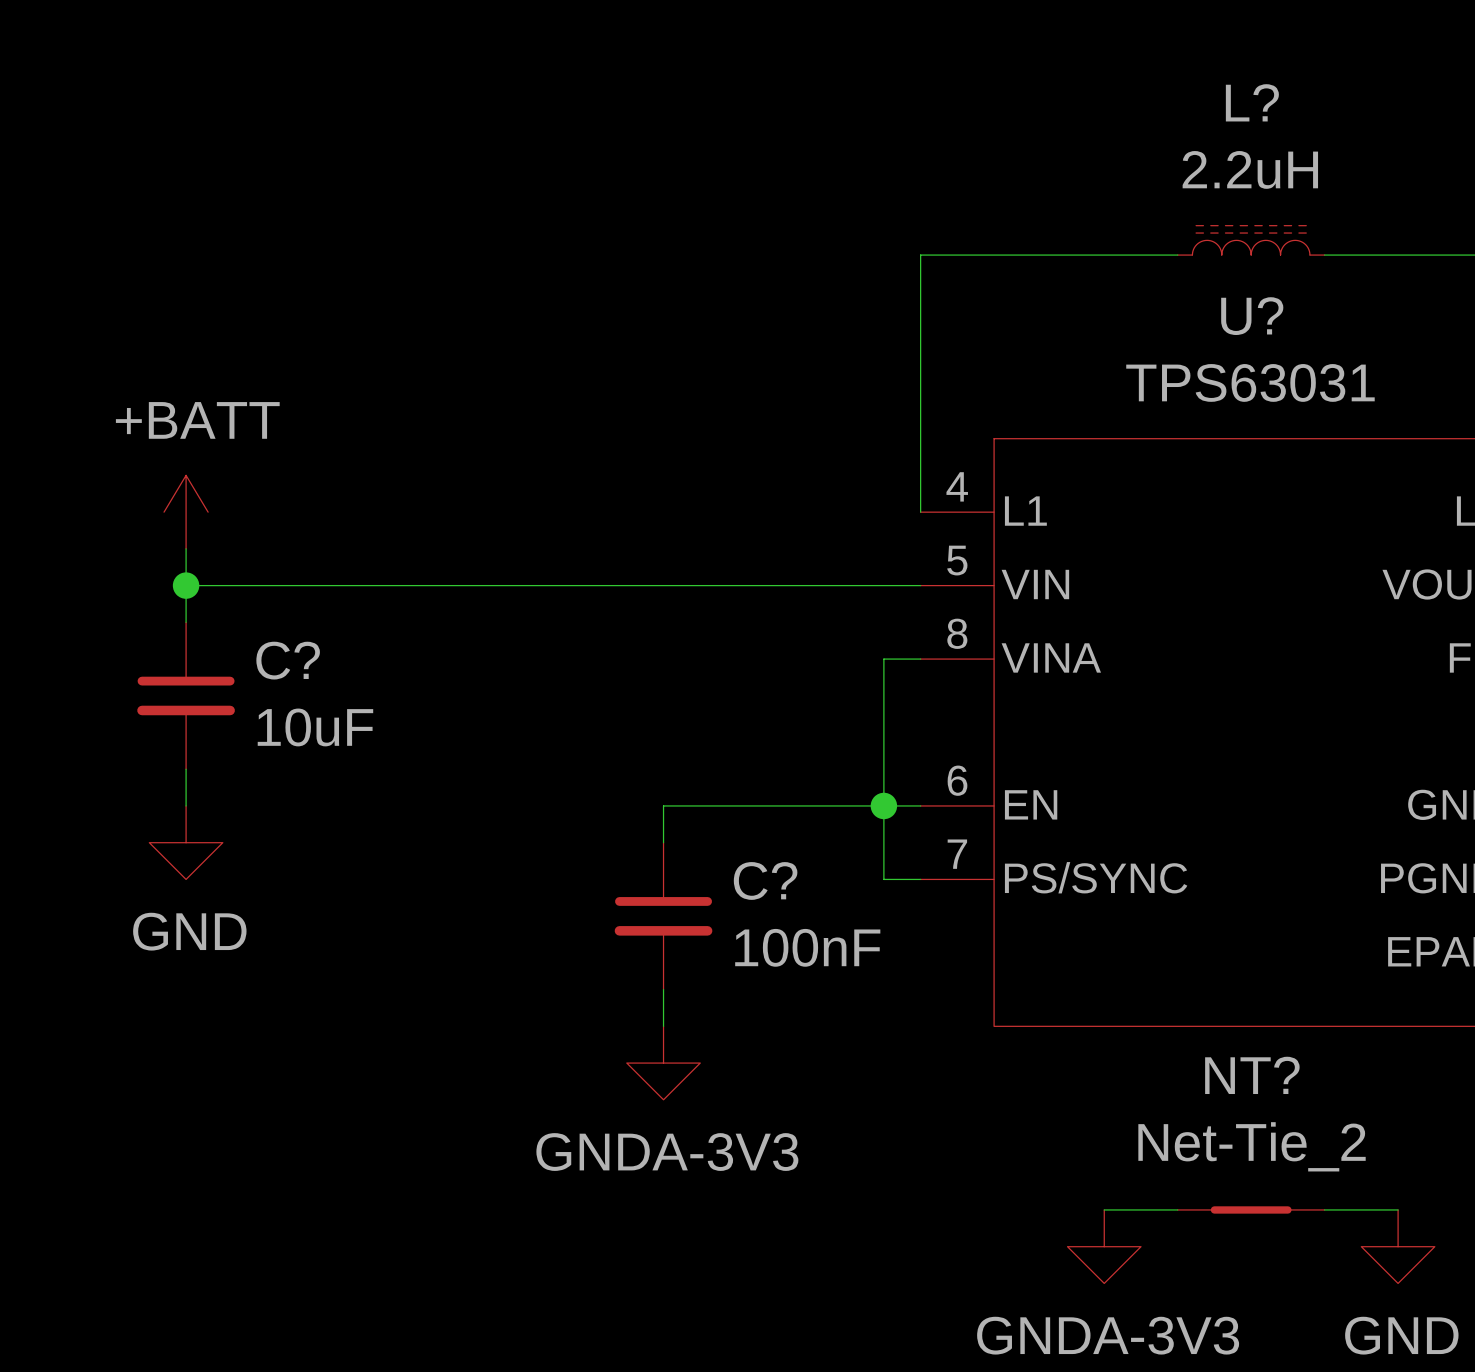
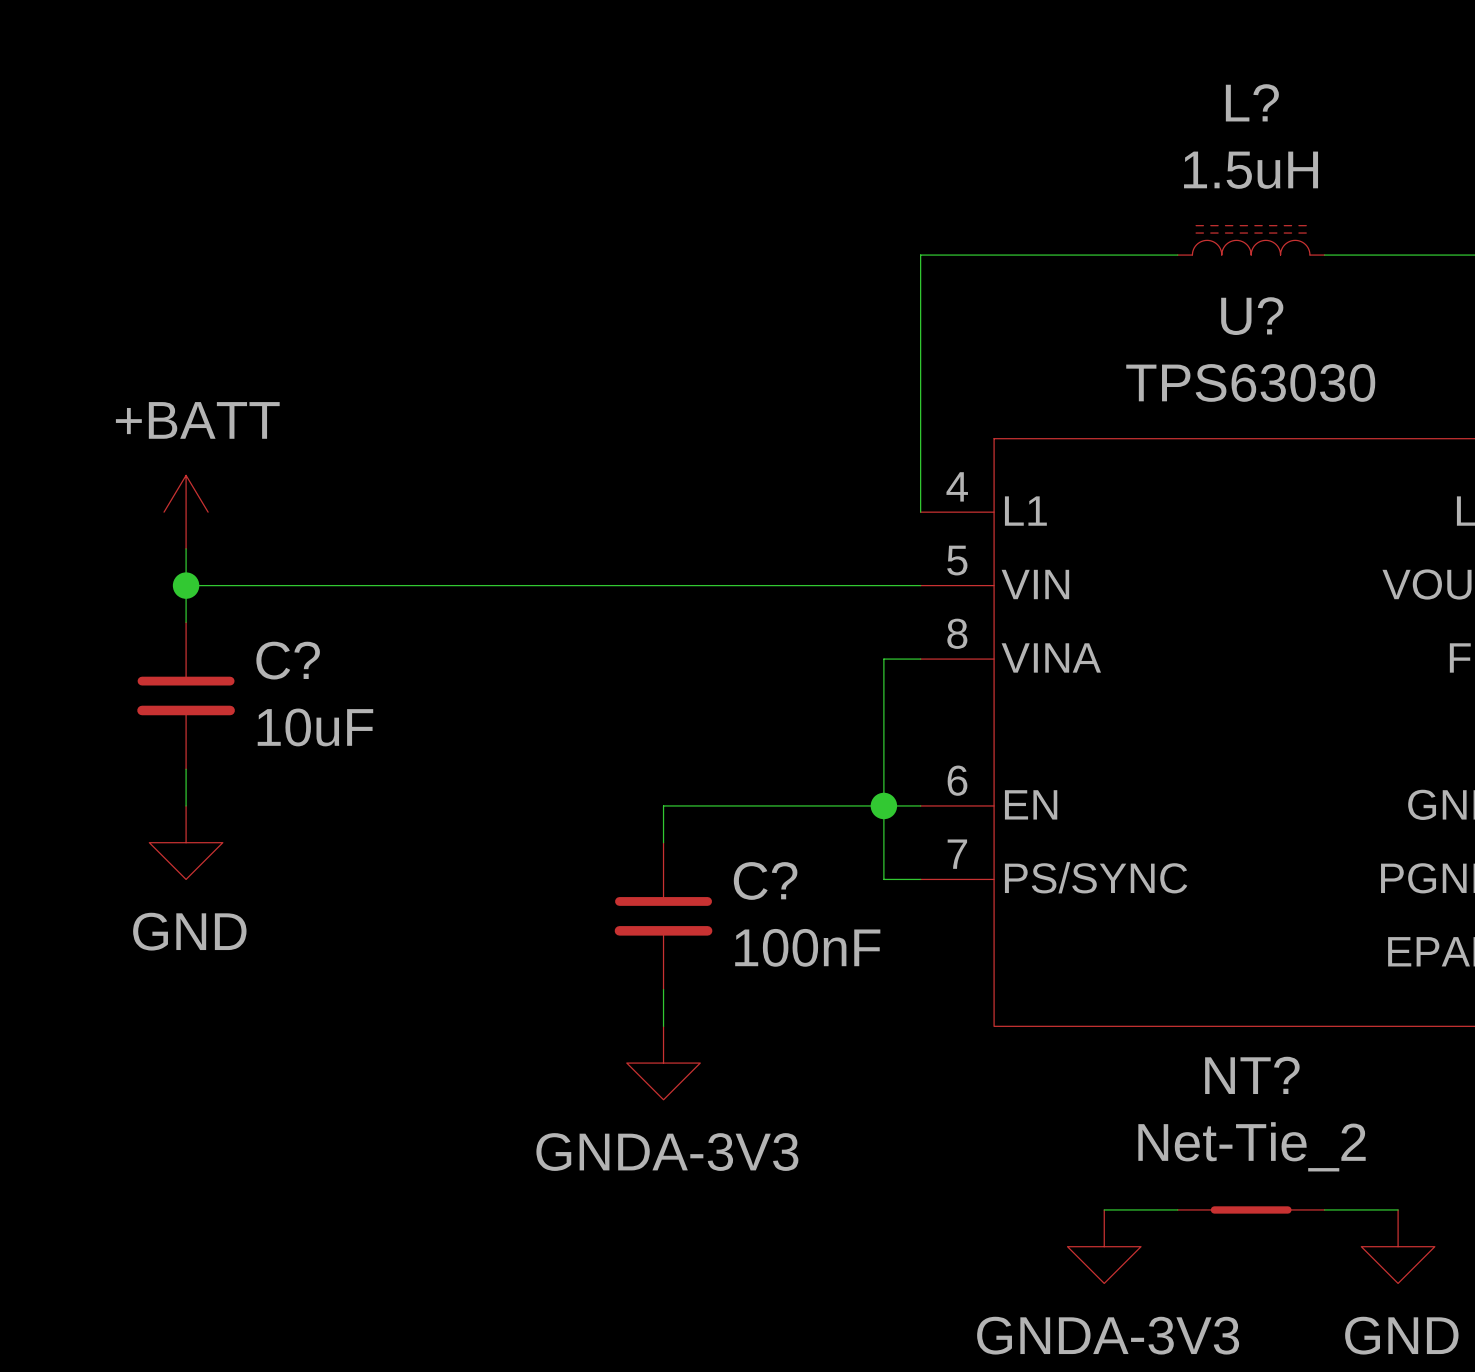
L? value: 2.2uH (1250, 169) -> 1.5uH (1251, 170)
U? value: TPS63031 (1250, 382) -> TPS63030 (1250, 382)

